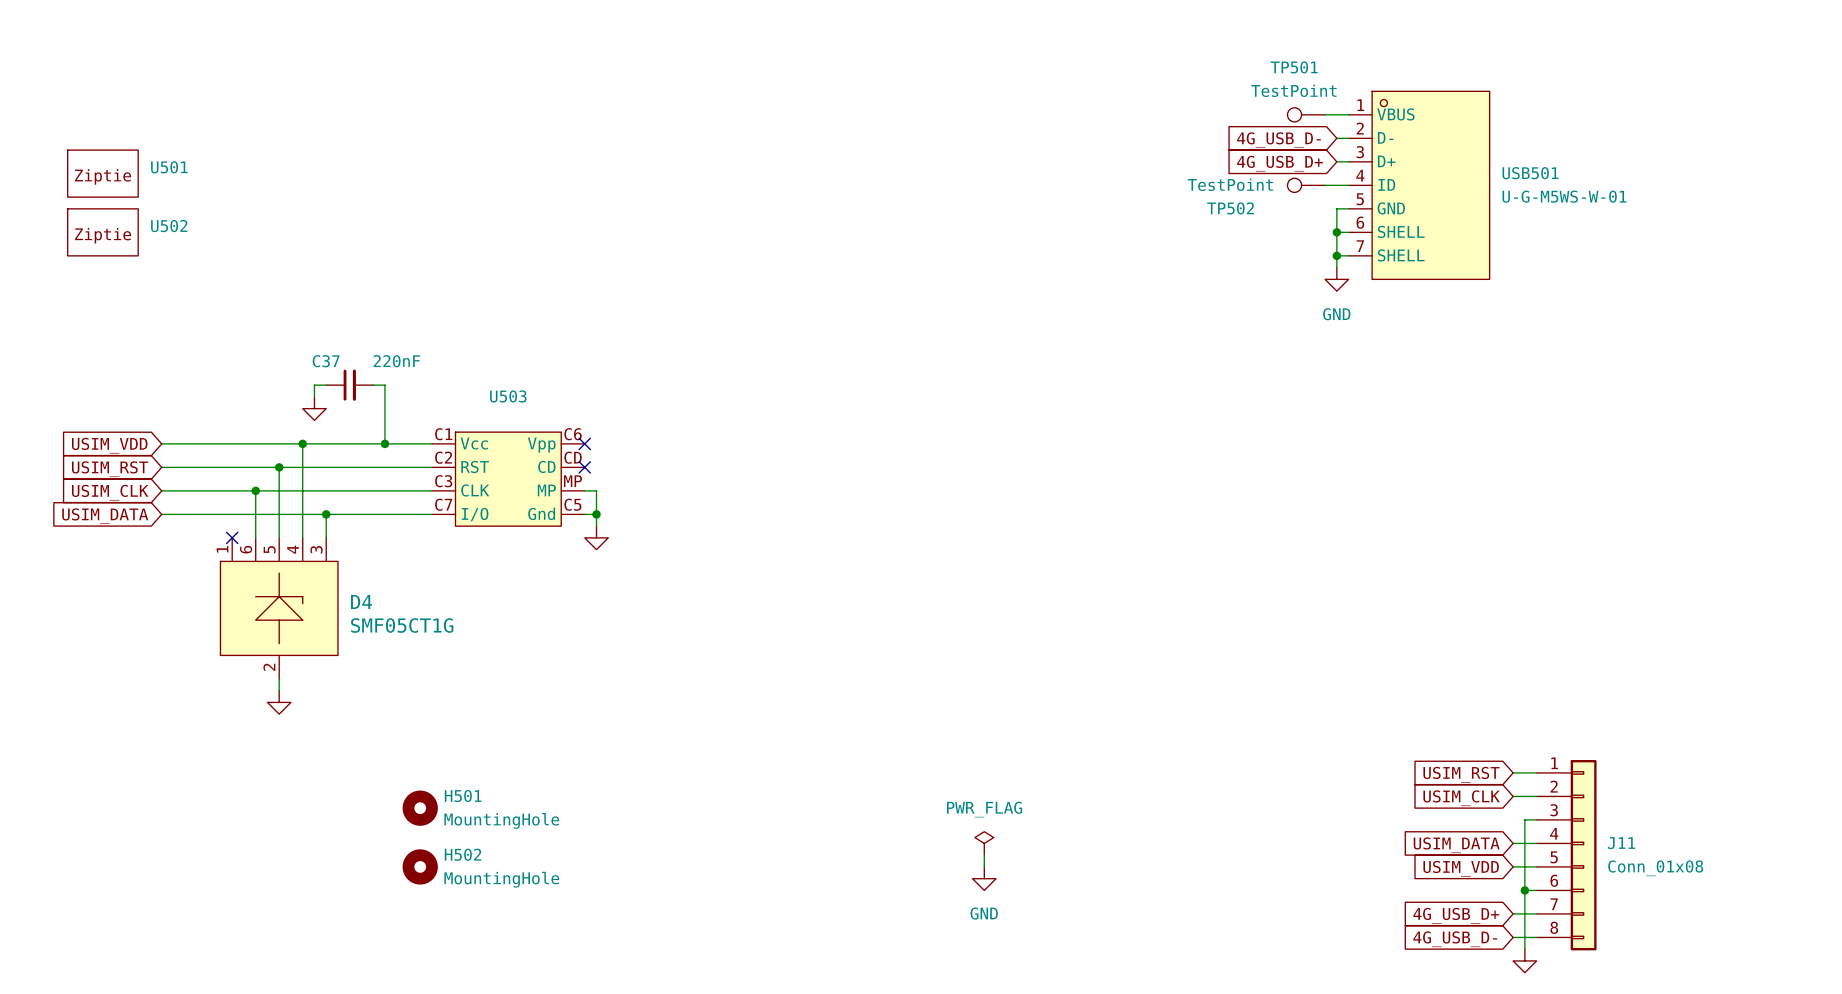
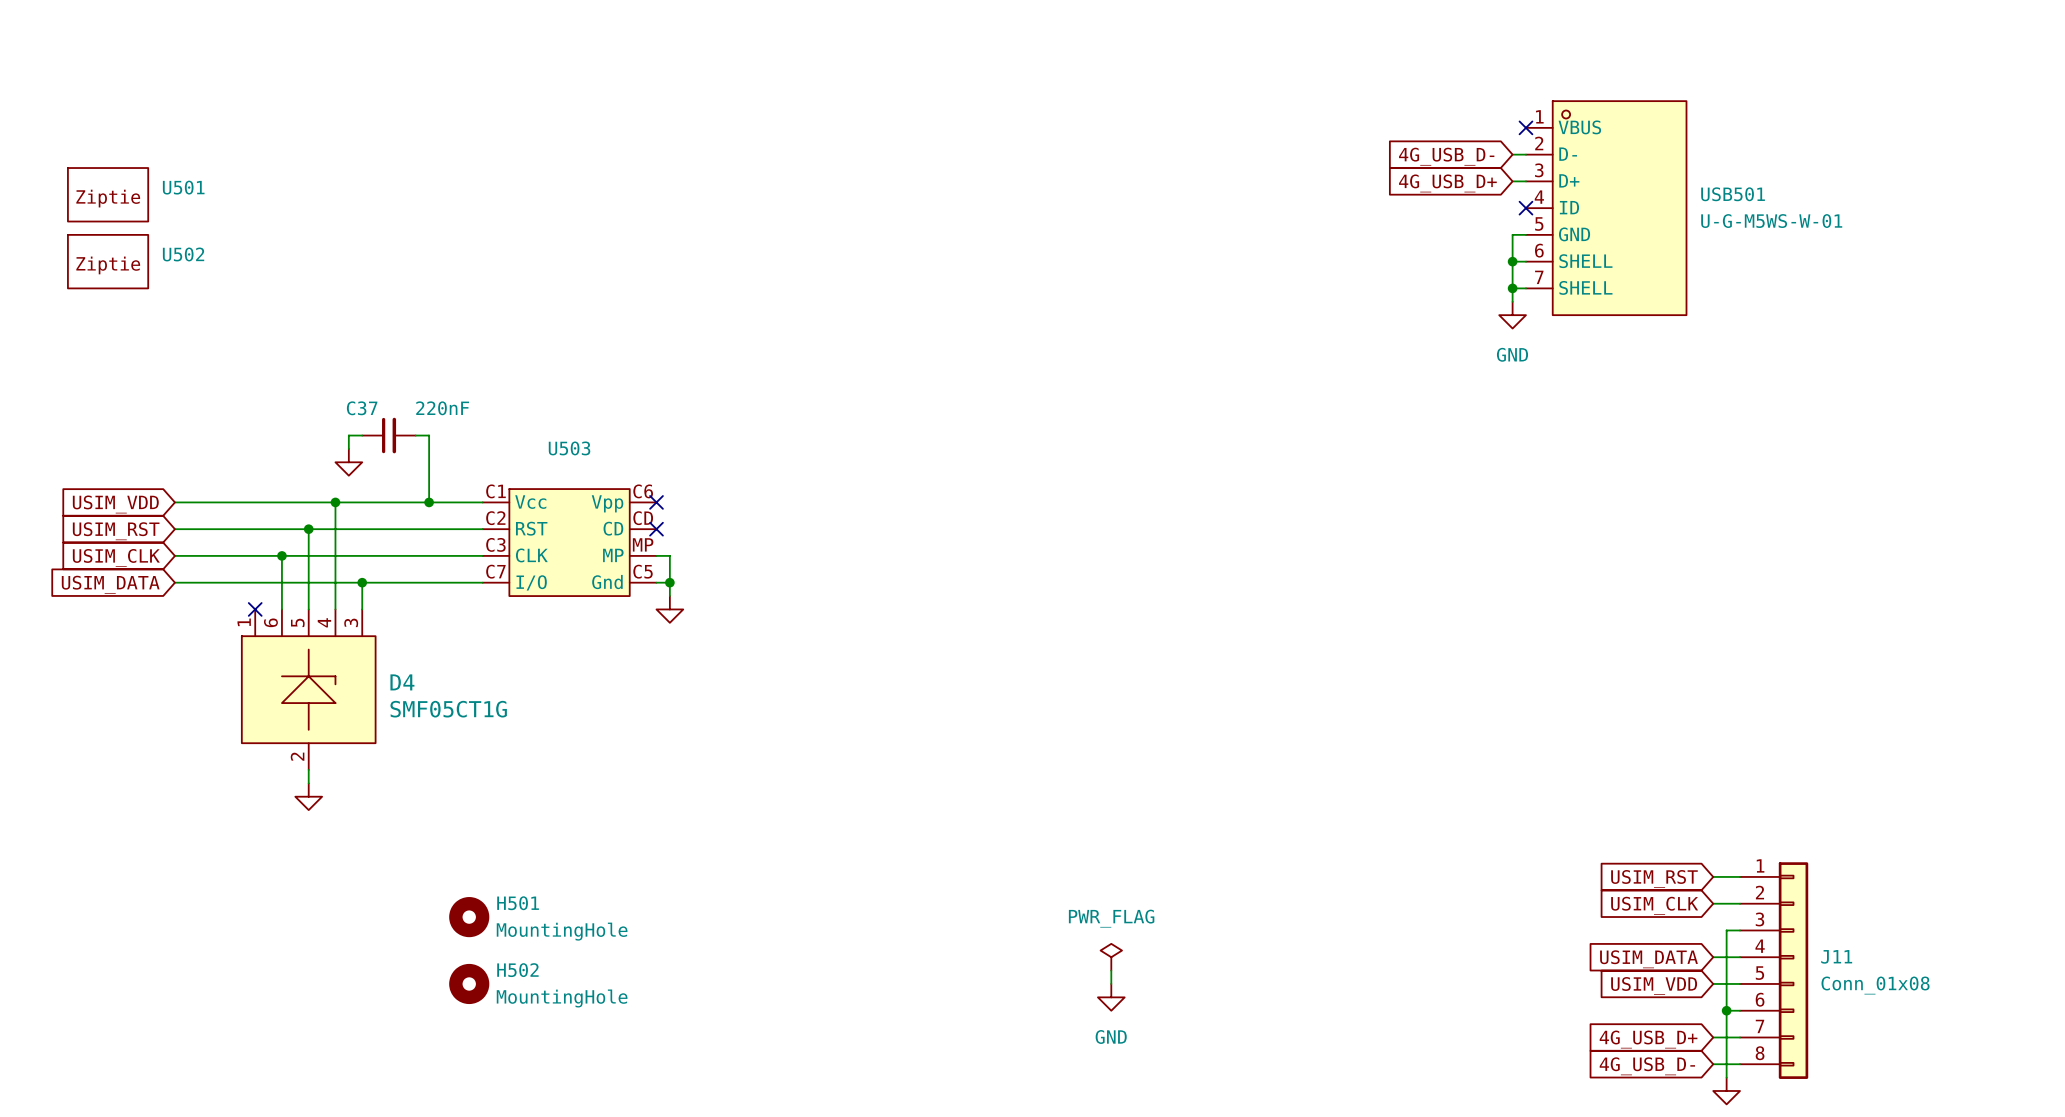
TP501: TestPoint (1306, 114) -> none
wire: (1325, 114) (1348, 114) -> none
no-connect mark: none -> (1525, 127)
TP502: TestPoint (1306, 185) -> none
wire: (1325, 185) (1348, 185) -> none
no-connect mark: none -> (1525, 208)

